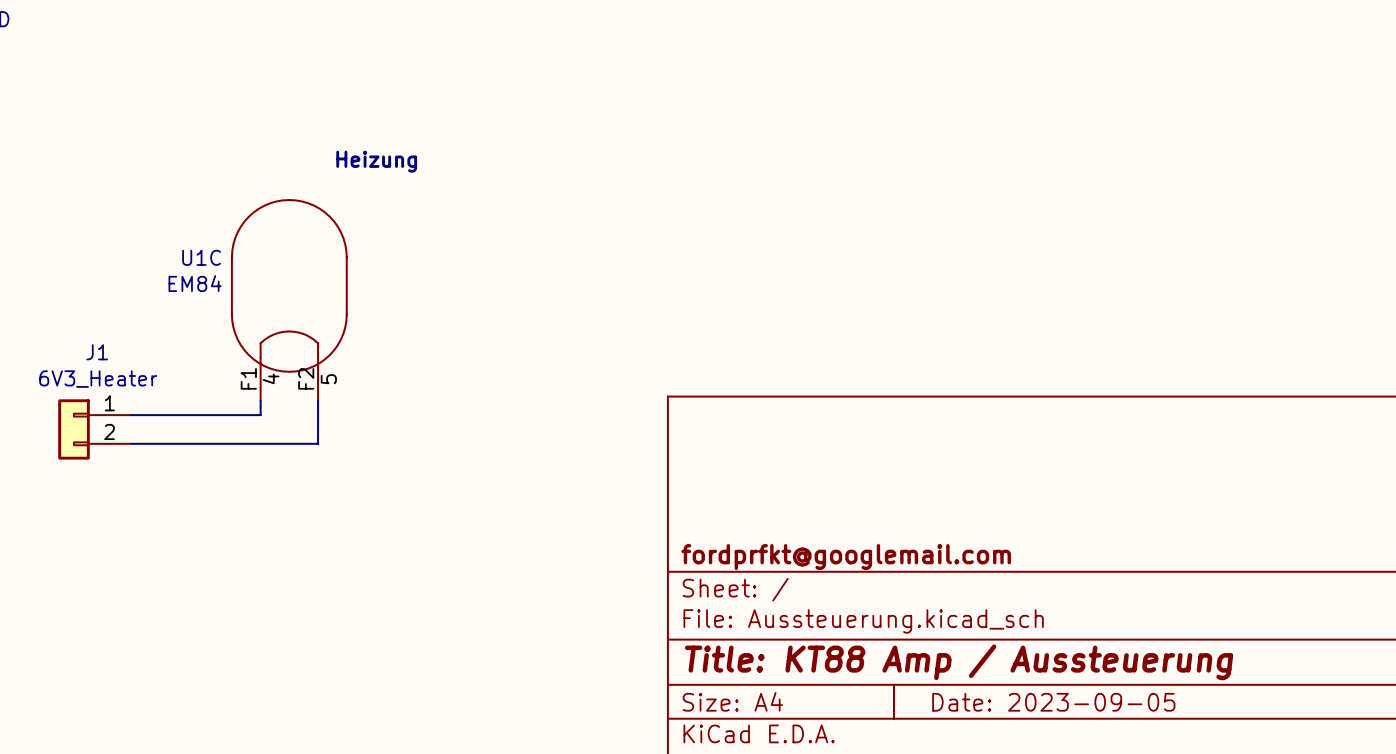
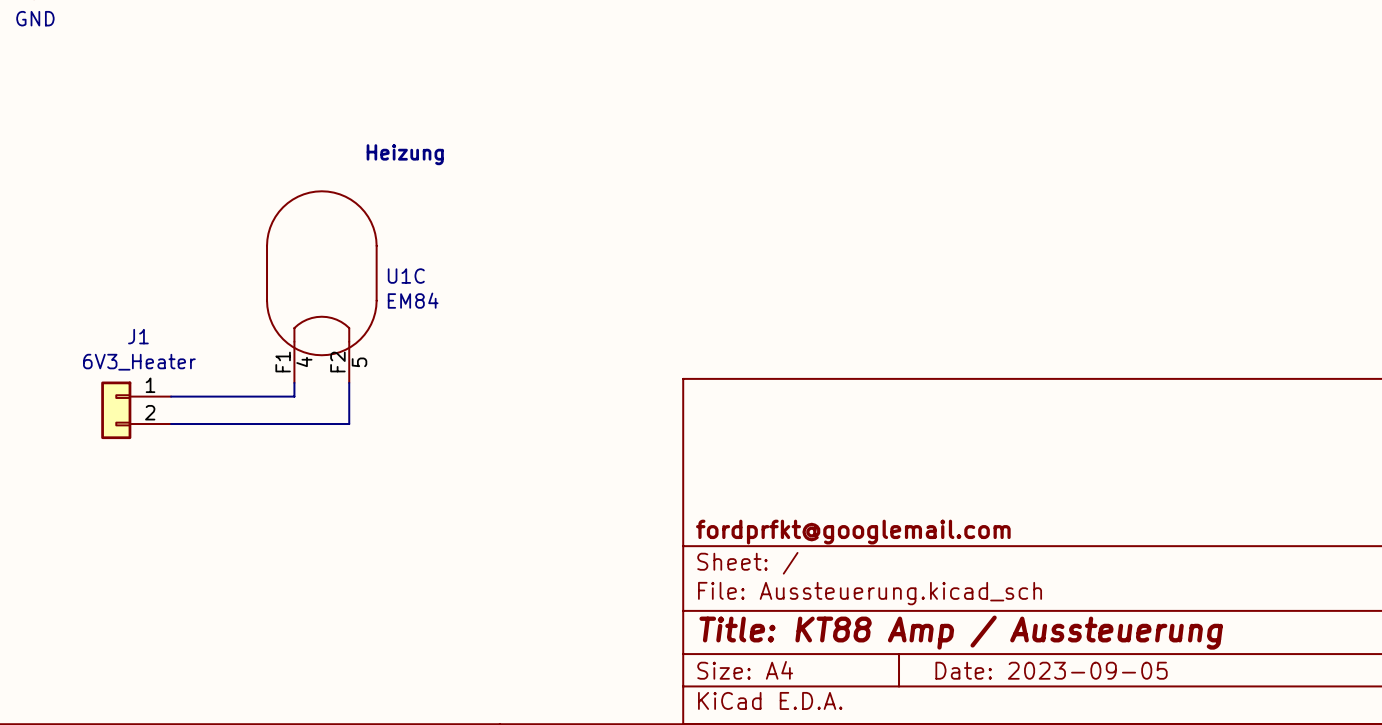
U1C name position: U1C (201, 257) -> U1C (406, 276)
U1C value position: EM84 (195, 283) -> EM84 (413, 300)

